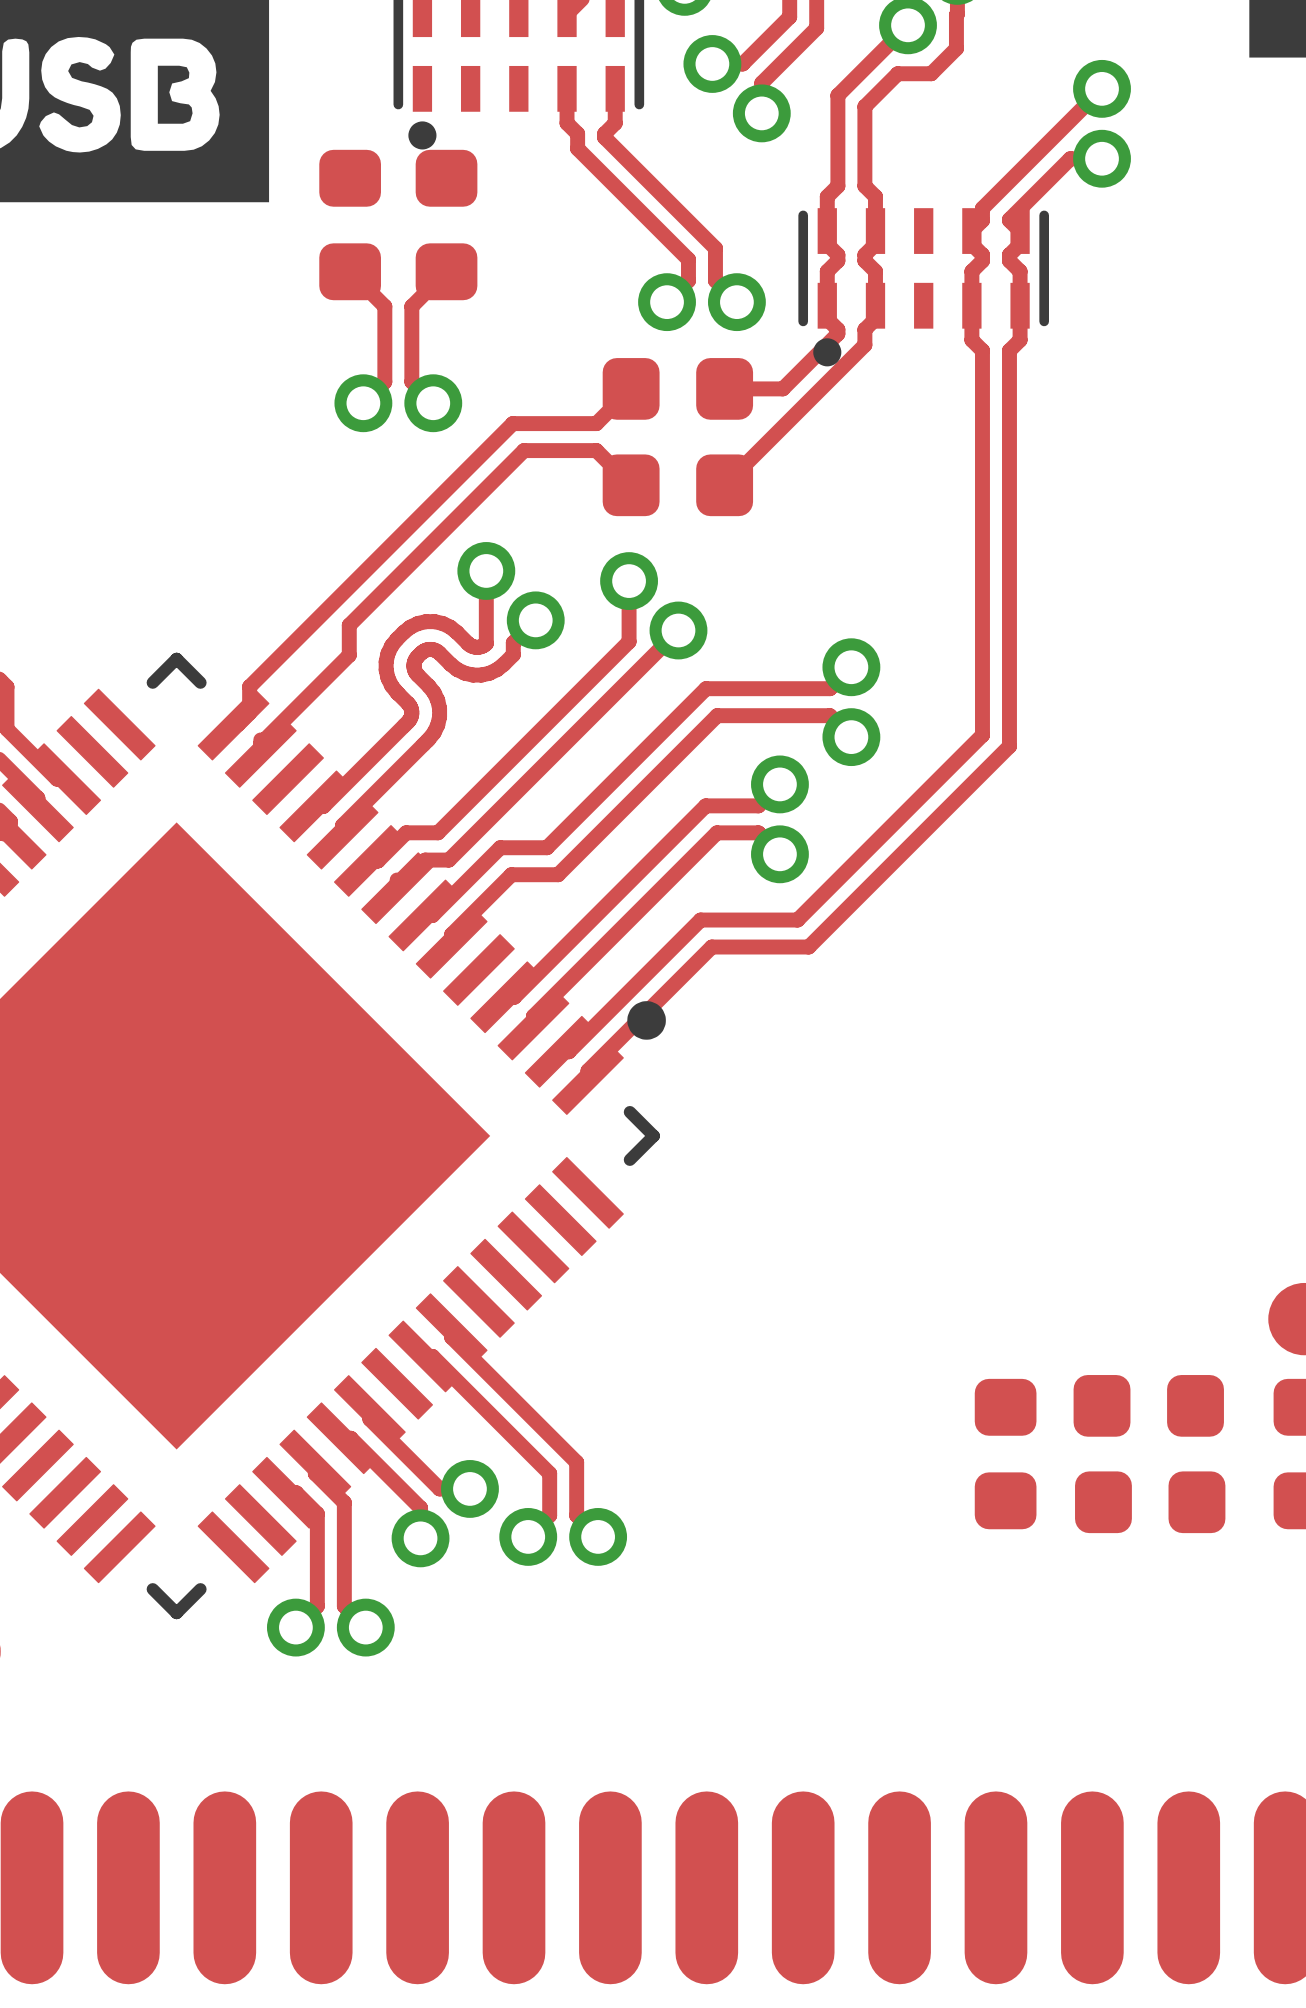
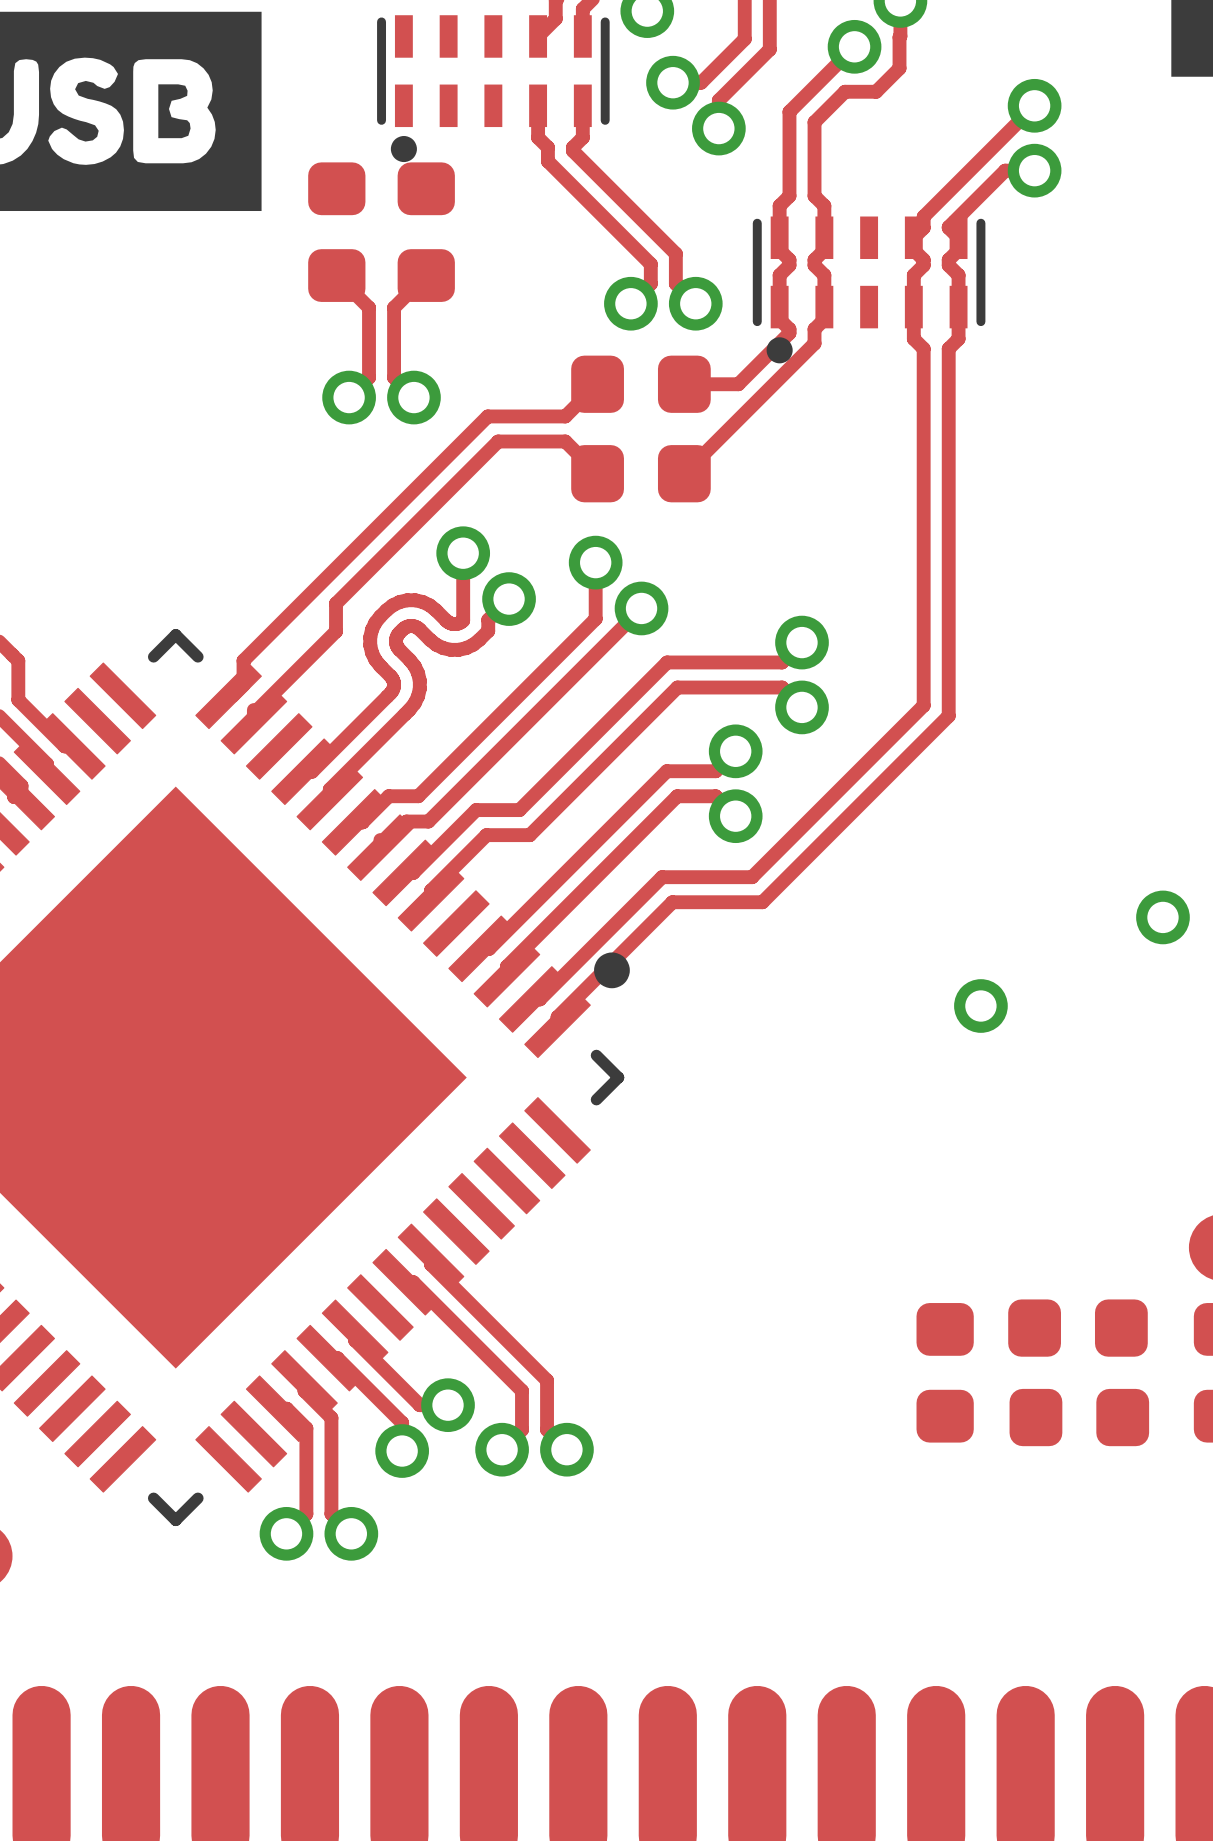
via: none -> (1162, 917)
via: none -> (980, 1006)

